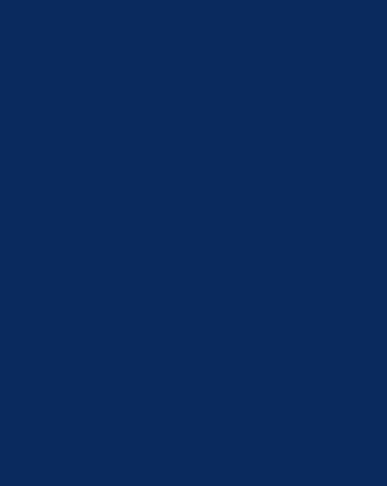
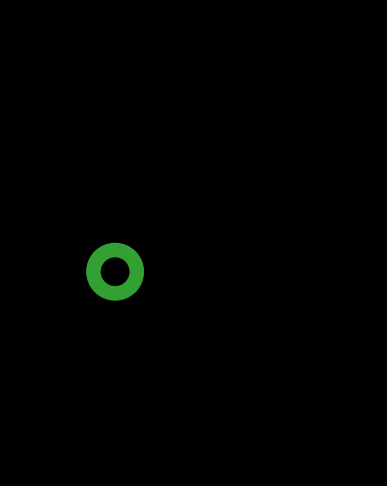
part: none -> (115, 271)

